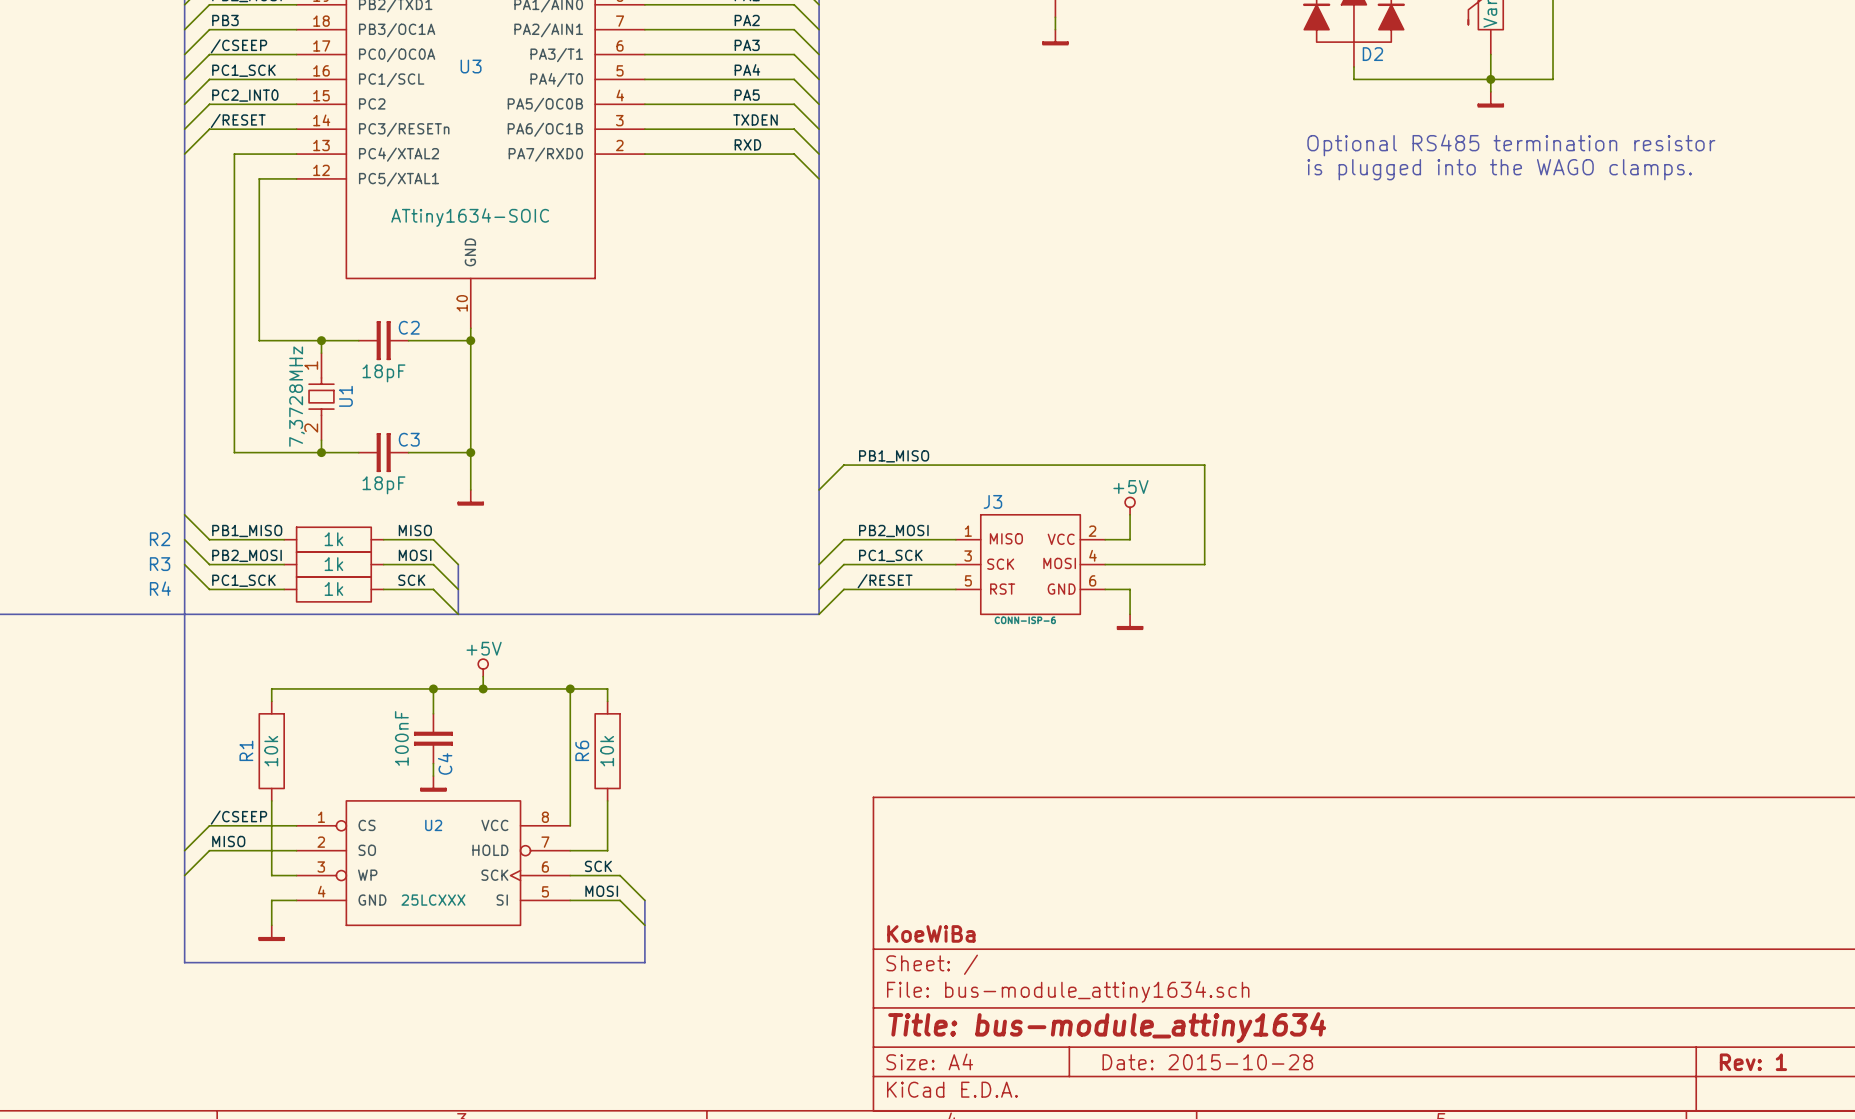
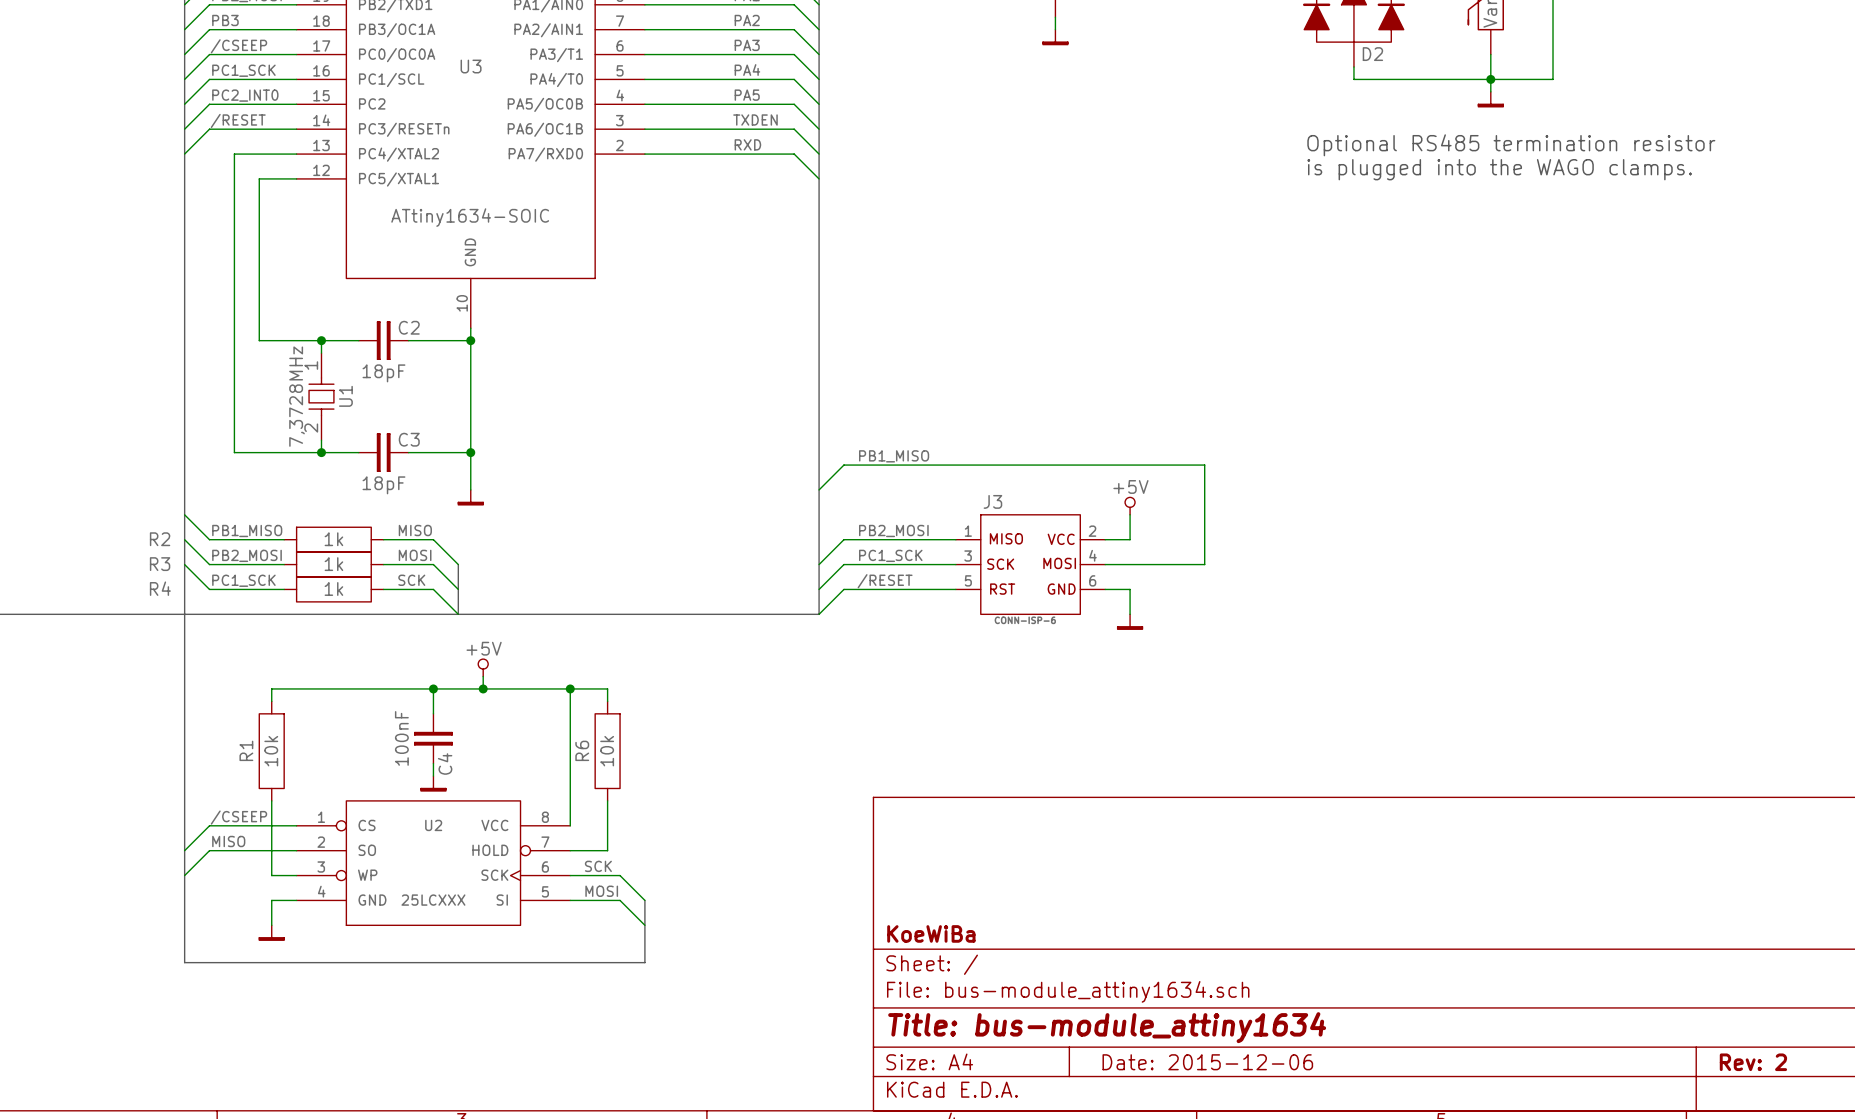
title block: Date: 2015-10-28 (1207, 1062) -> Date: 2015-12-06 (1207, 1062)
title block: Rev: 1 (1753, 1062) -> Rev: 2 (1753, 1062)

